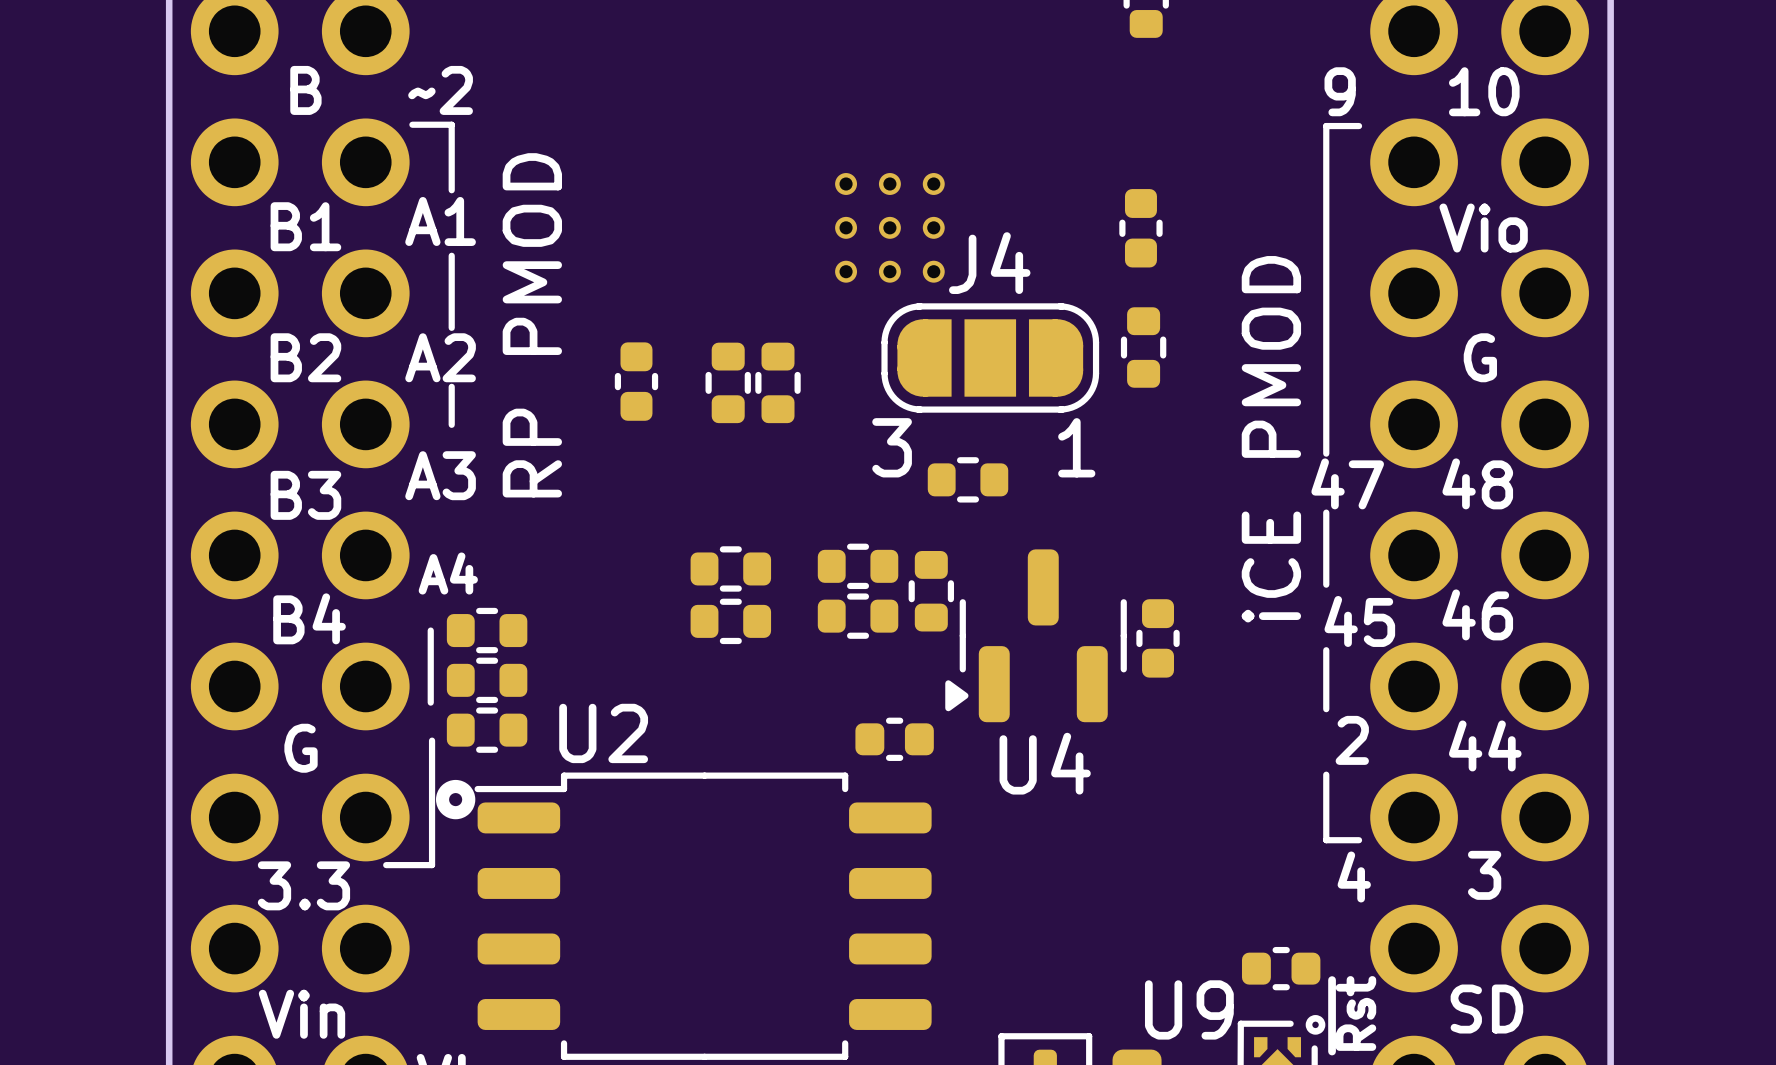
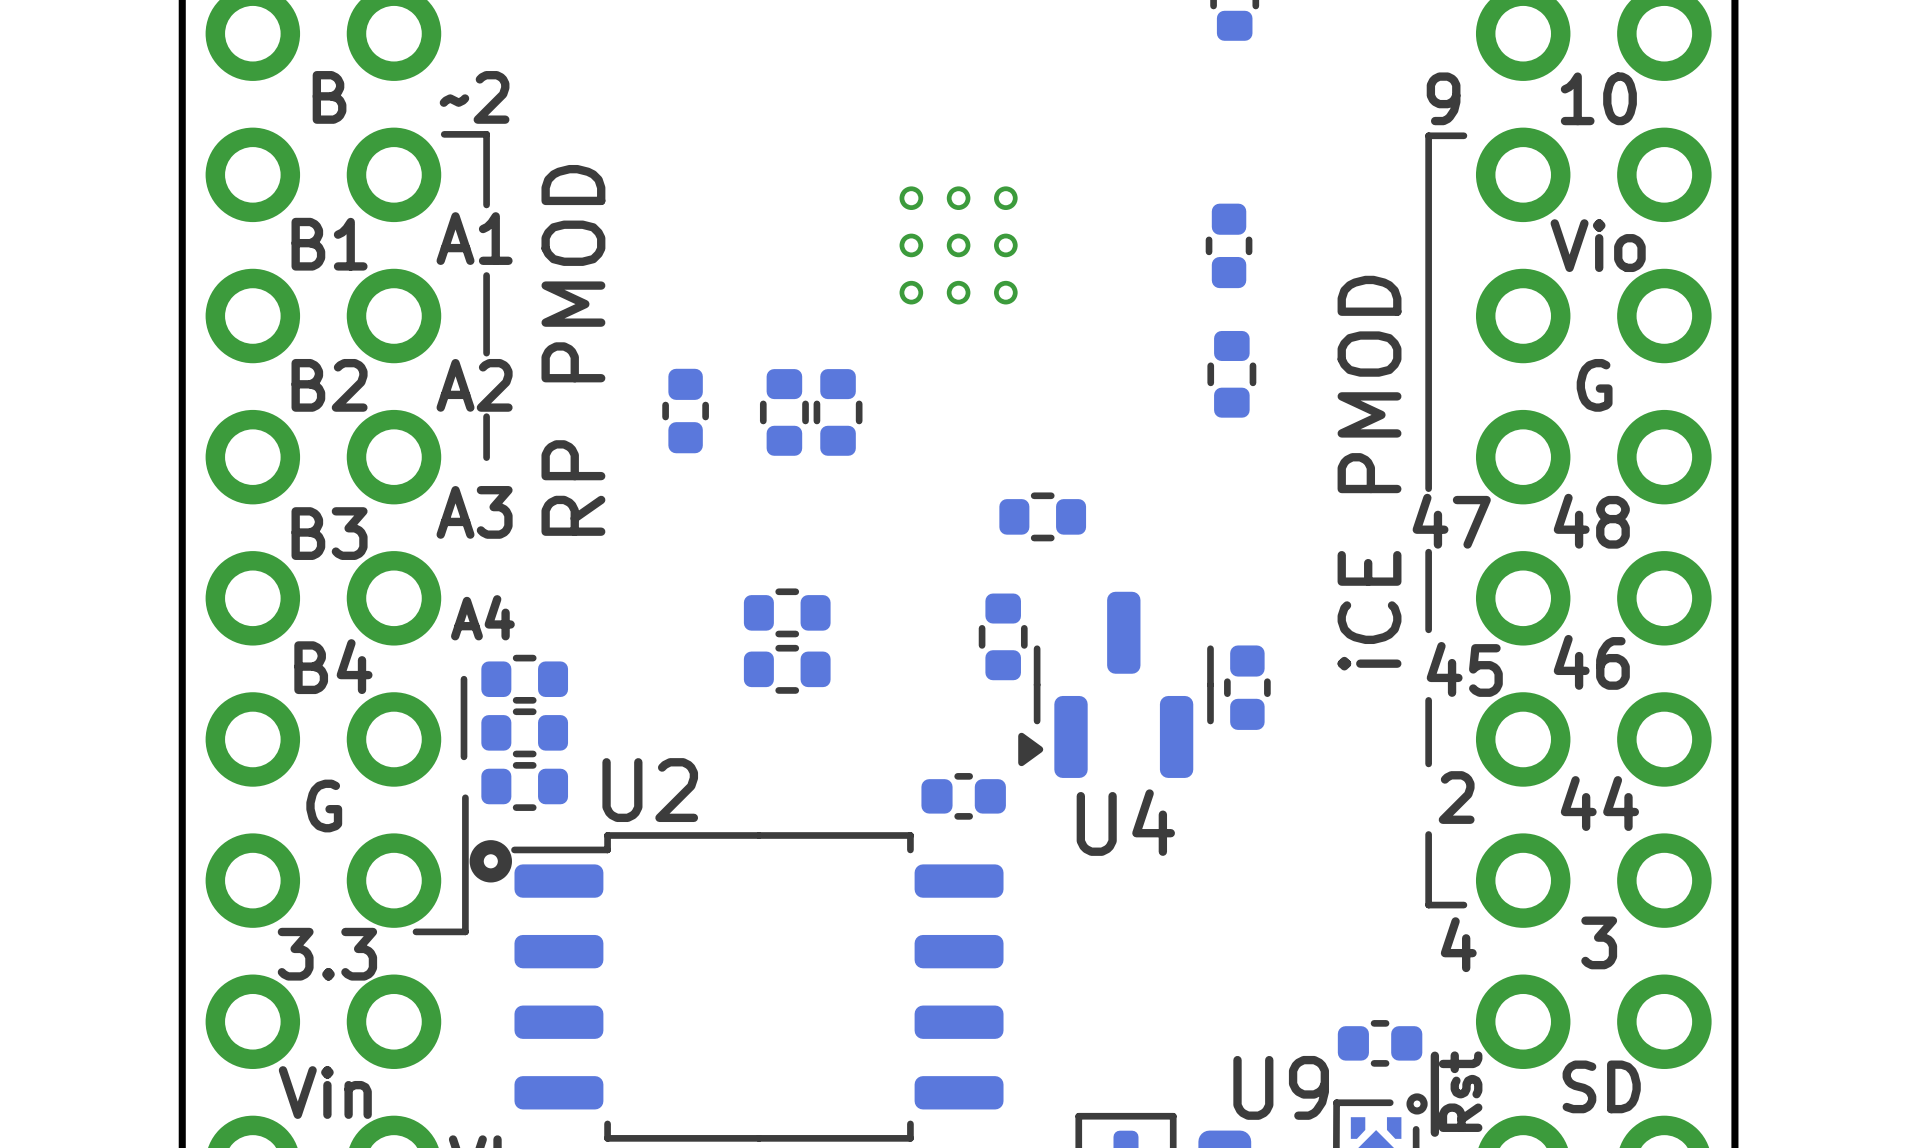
J4: (990, 357) -> none
part: (858, 566) -> none
part: (858, 616) -> none

